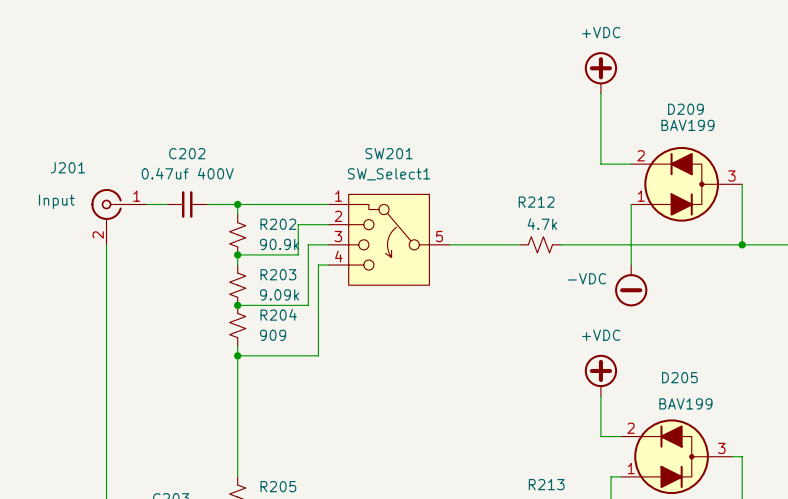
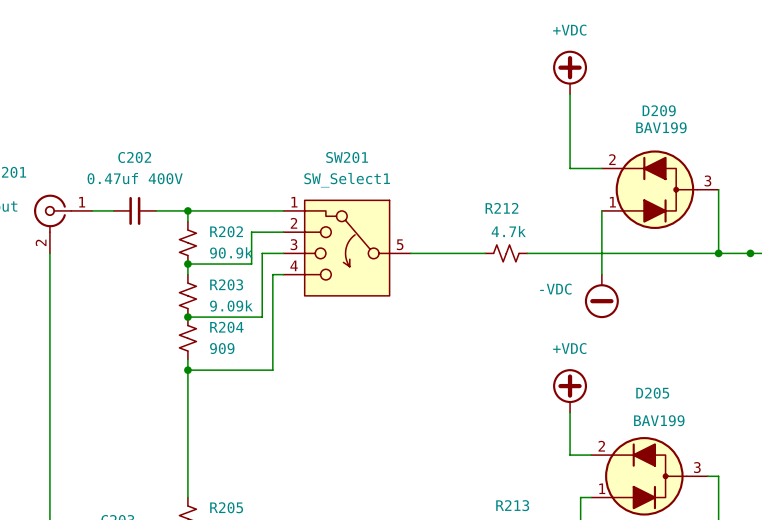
junction: none -> (750, 253)

